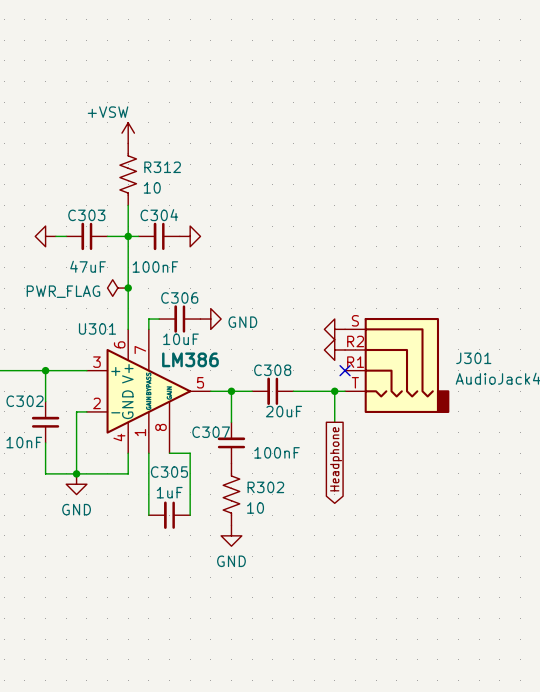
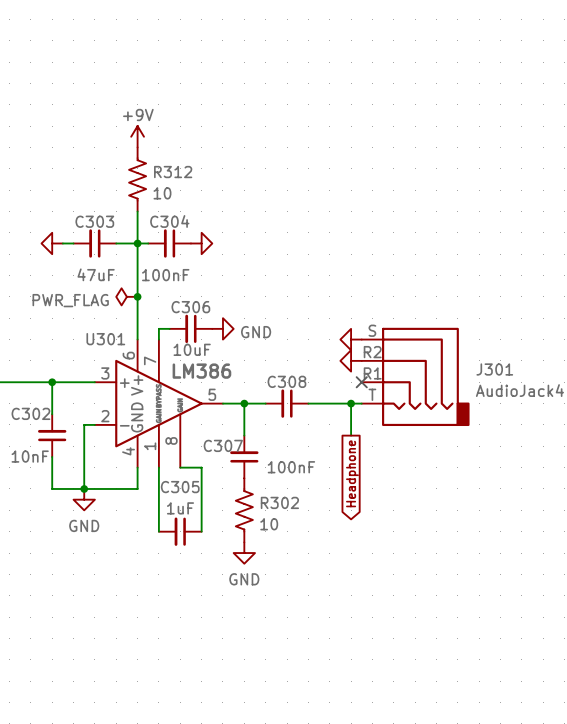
power symbol: +VSW (128, 133) -> +9V (137, 136)
C308 value: 20uF (284, 411) -> none

